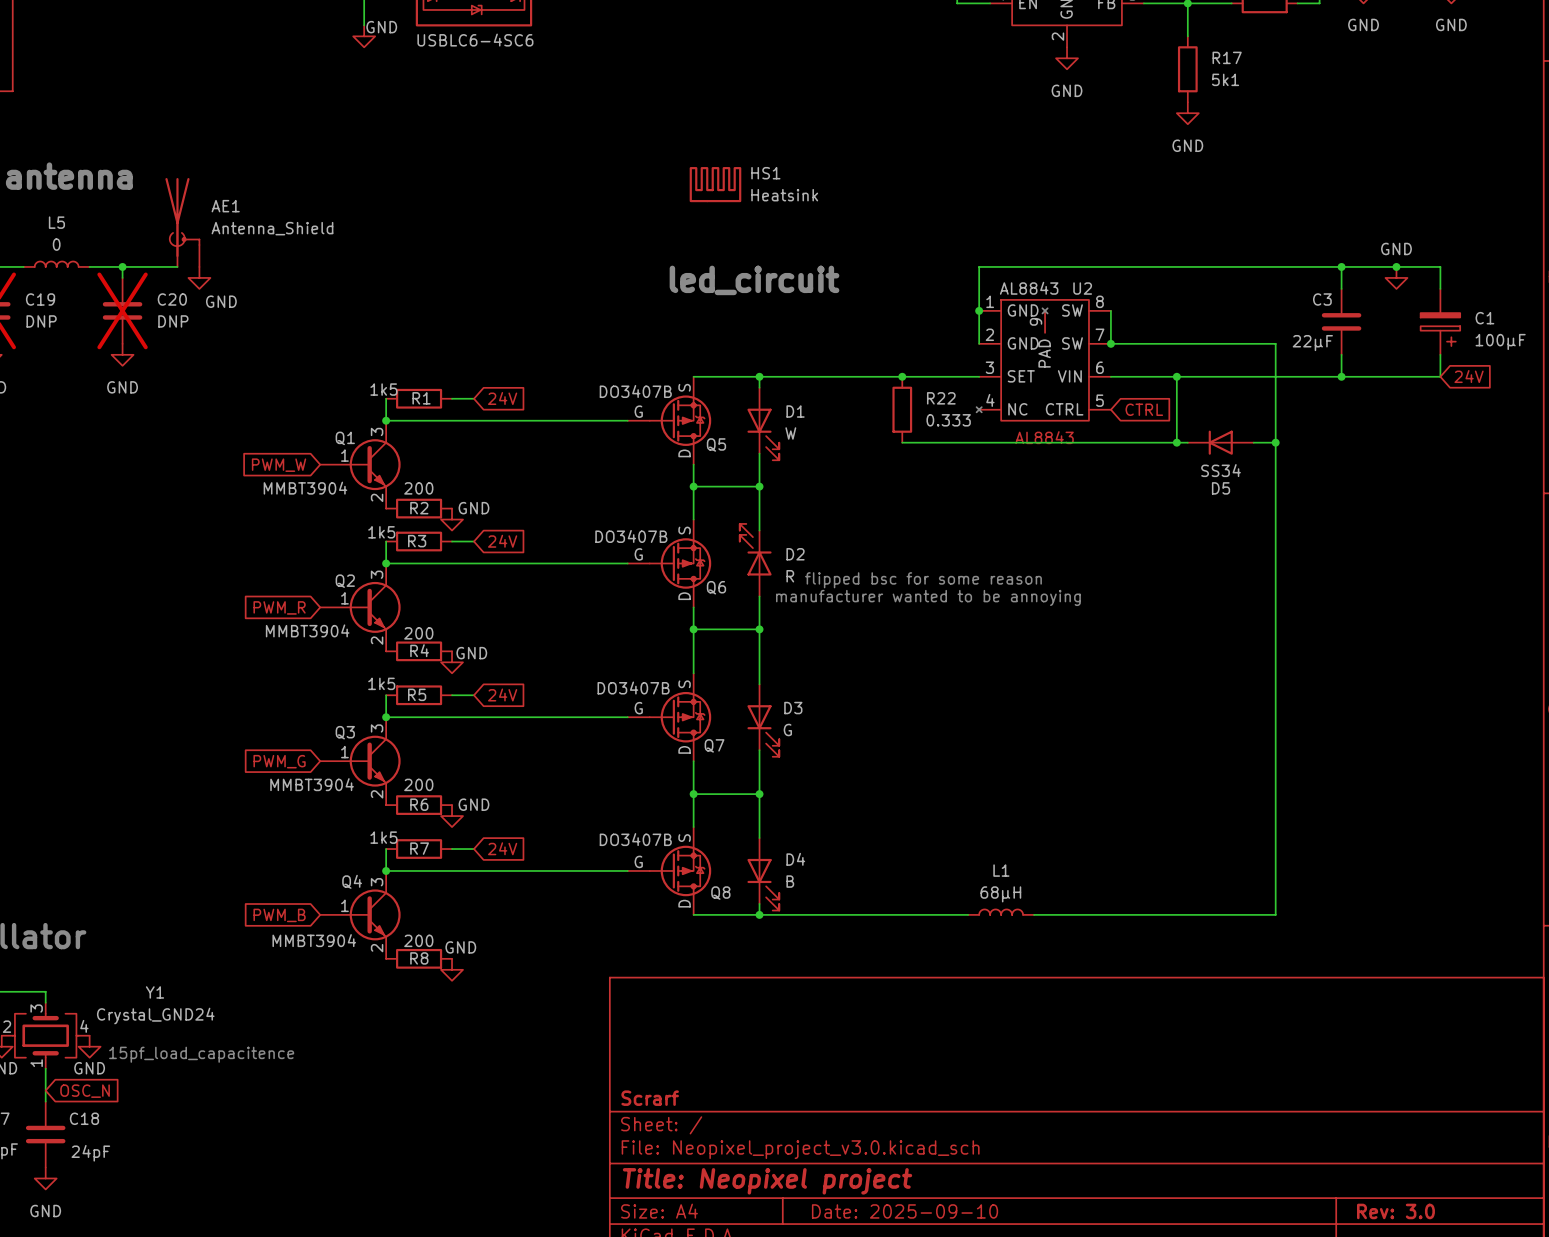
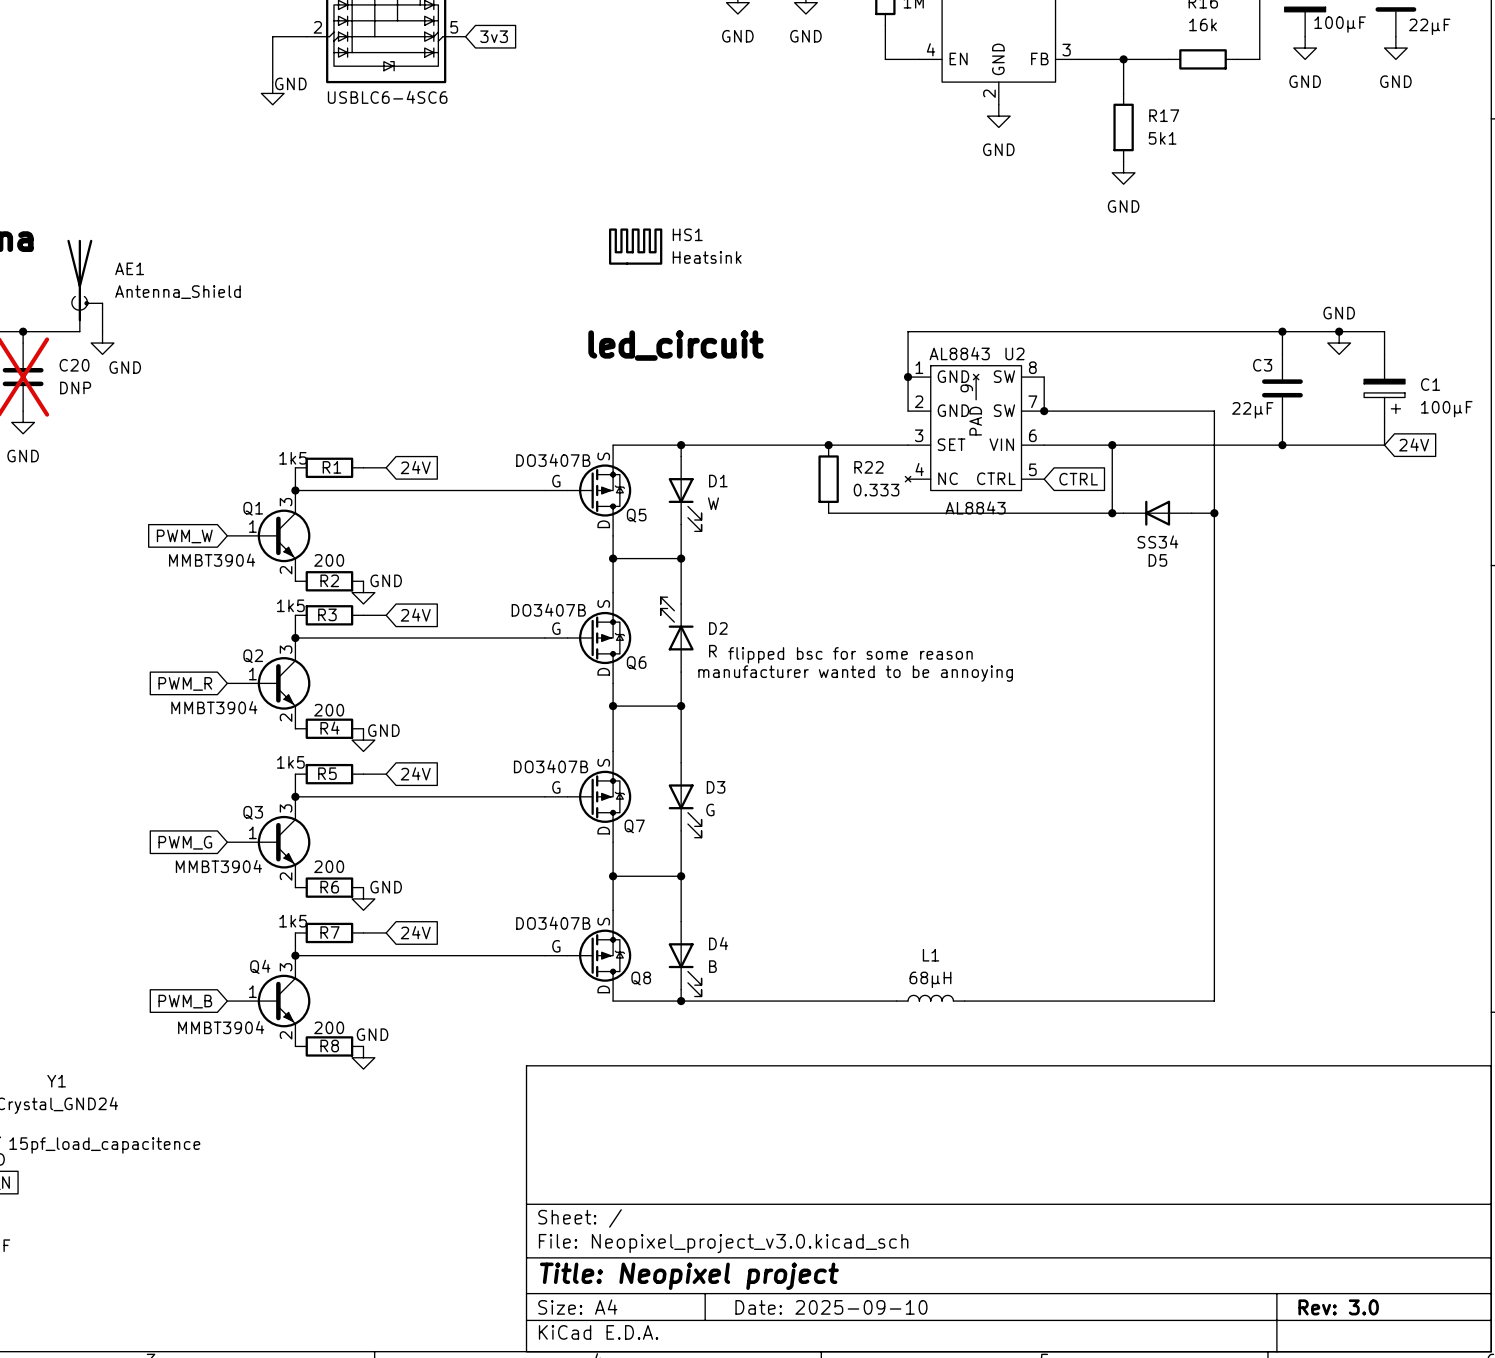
title block: Scrarf (650, 1098) -> none

